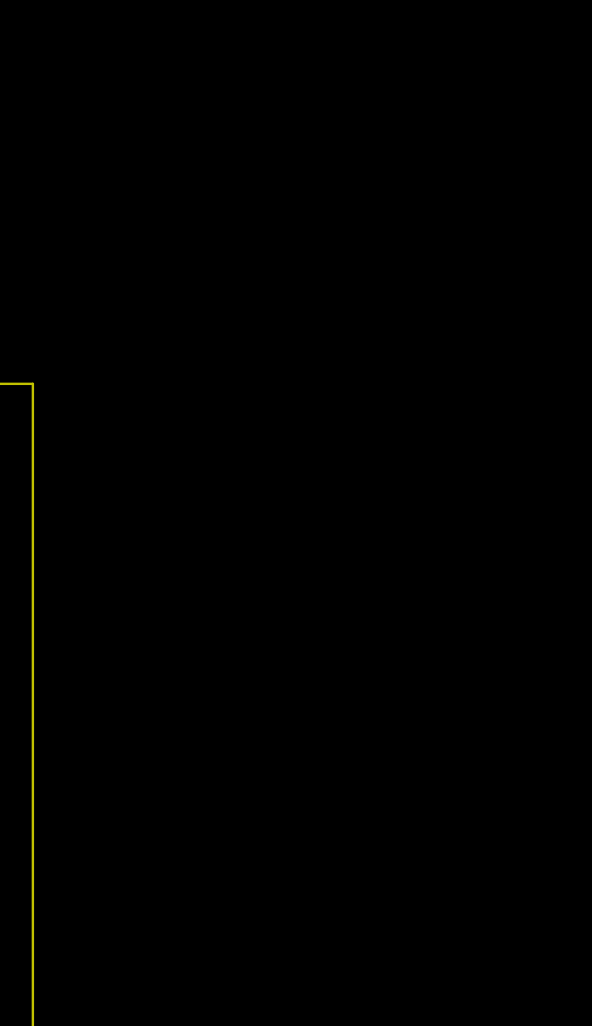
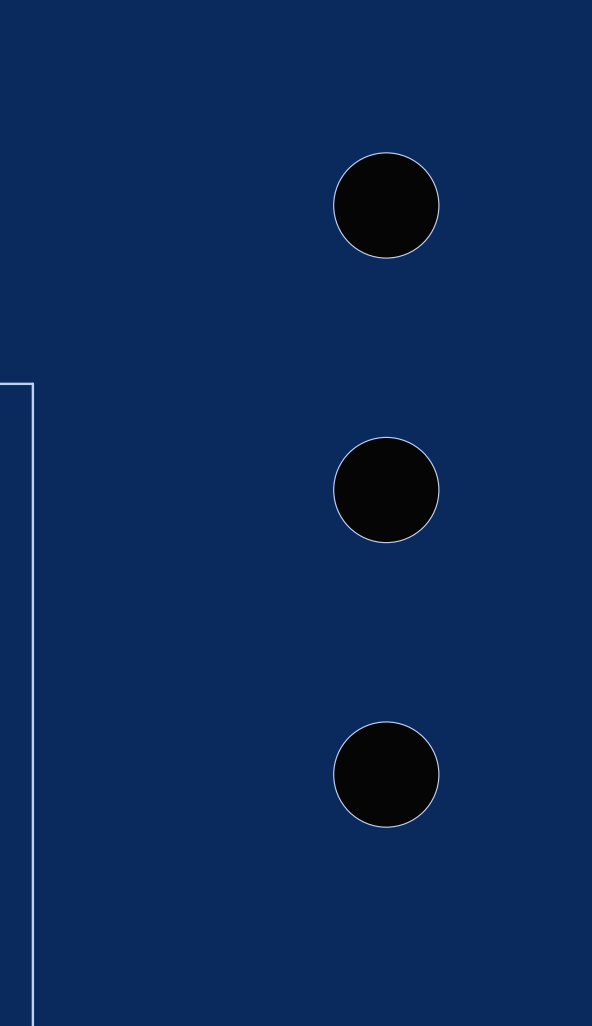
part: none -> (386, 205)
part: none -> (386, 490)
part: none -> (386, 774)

